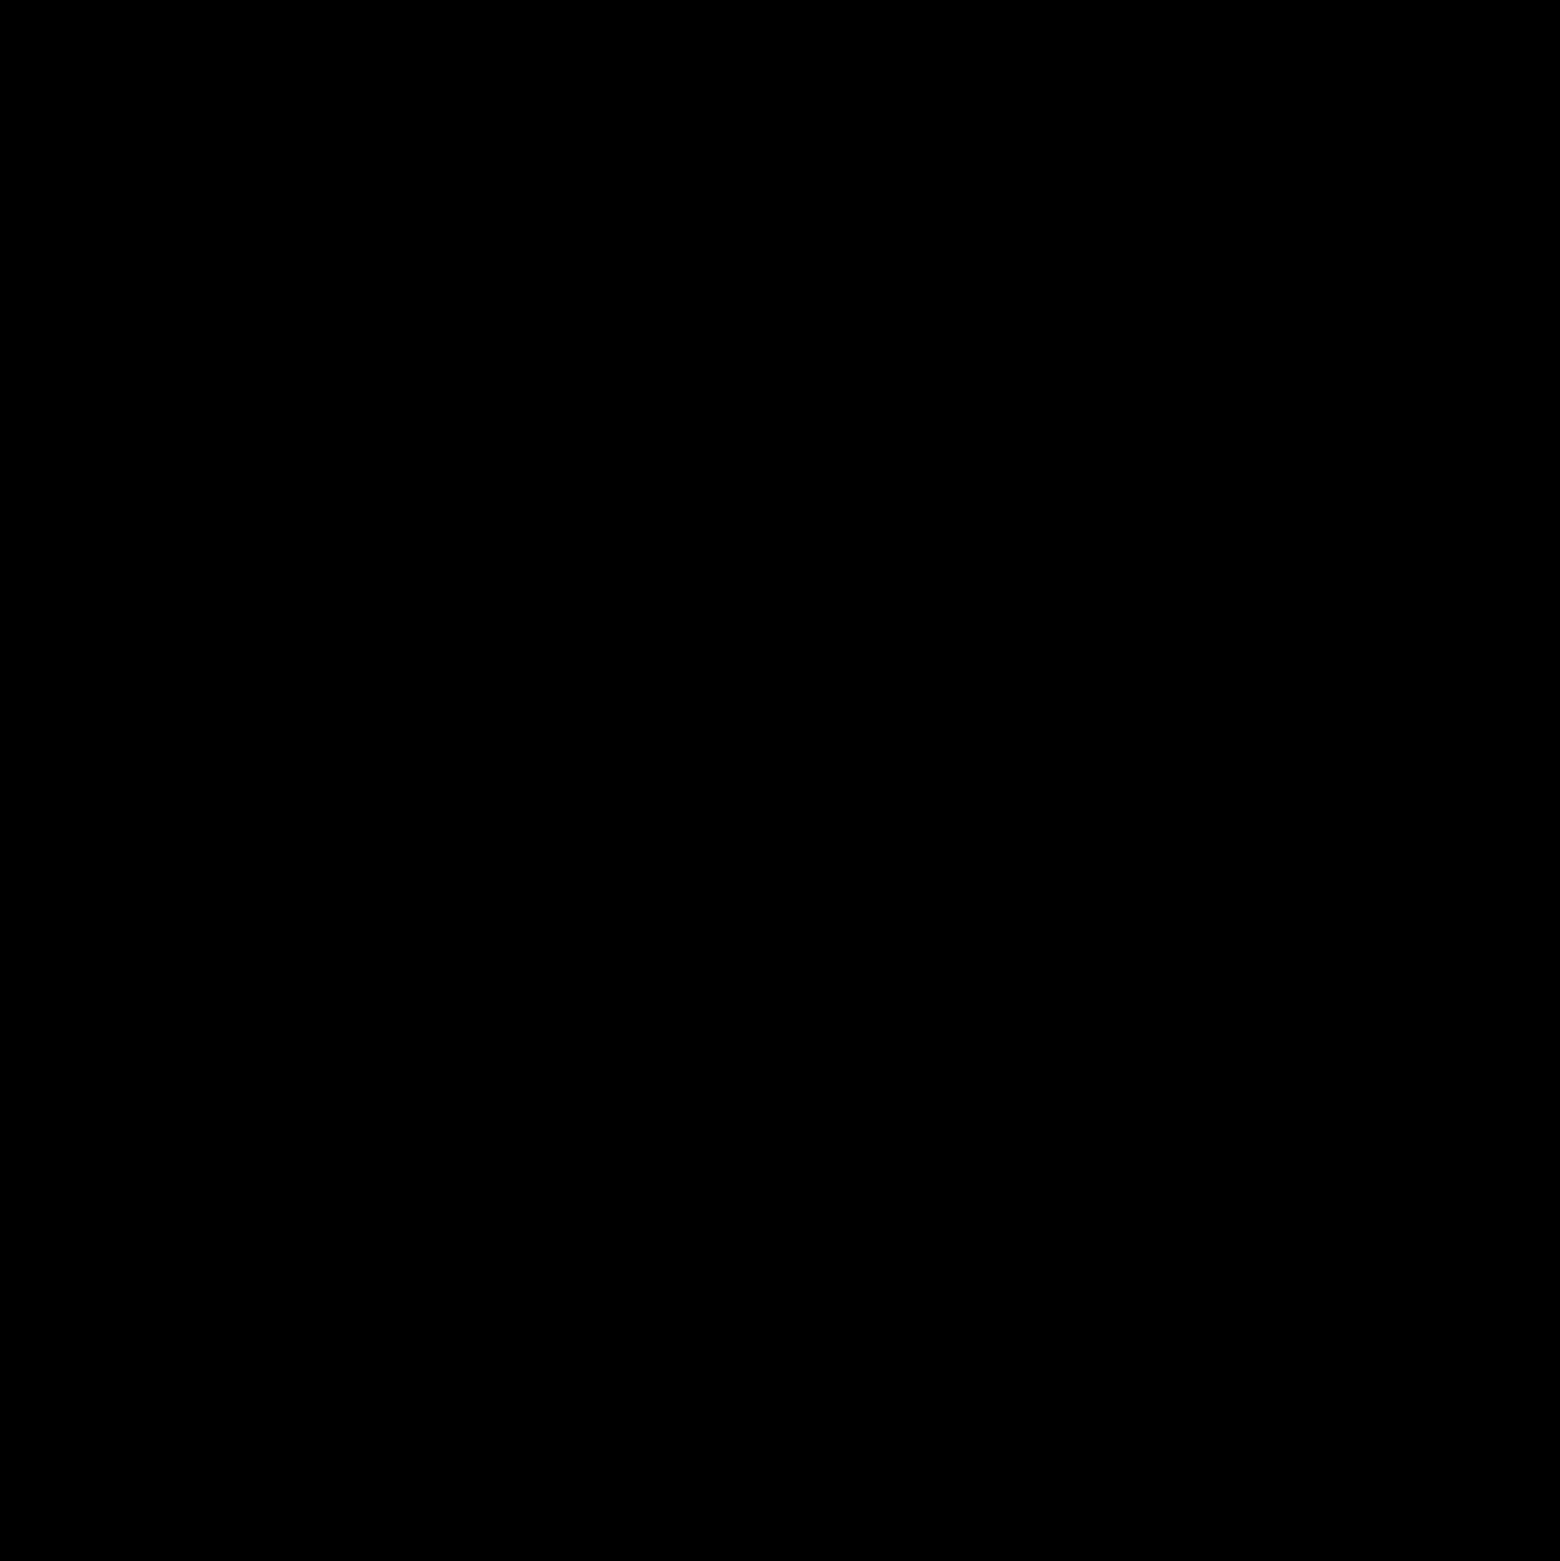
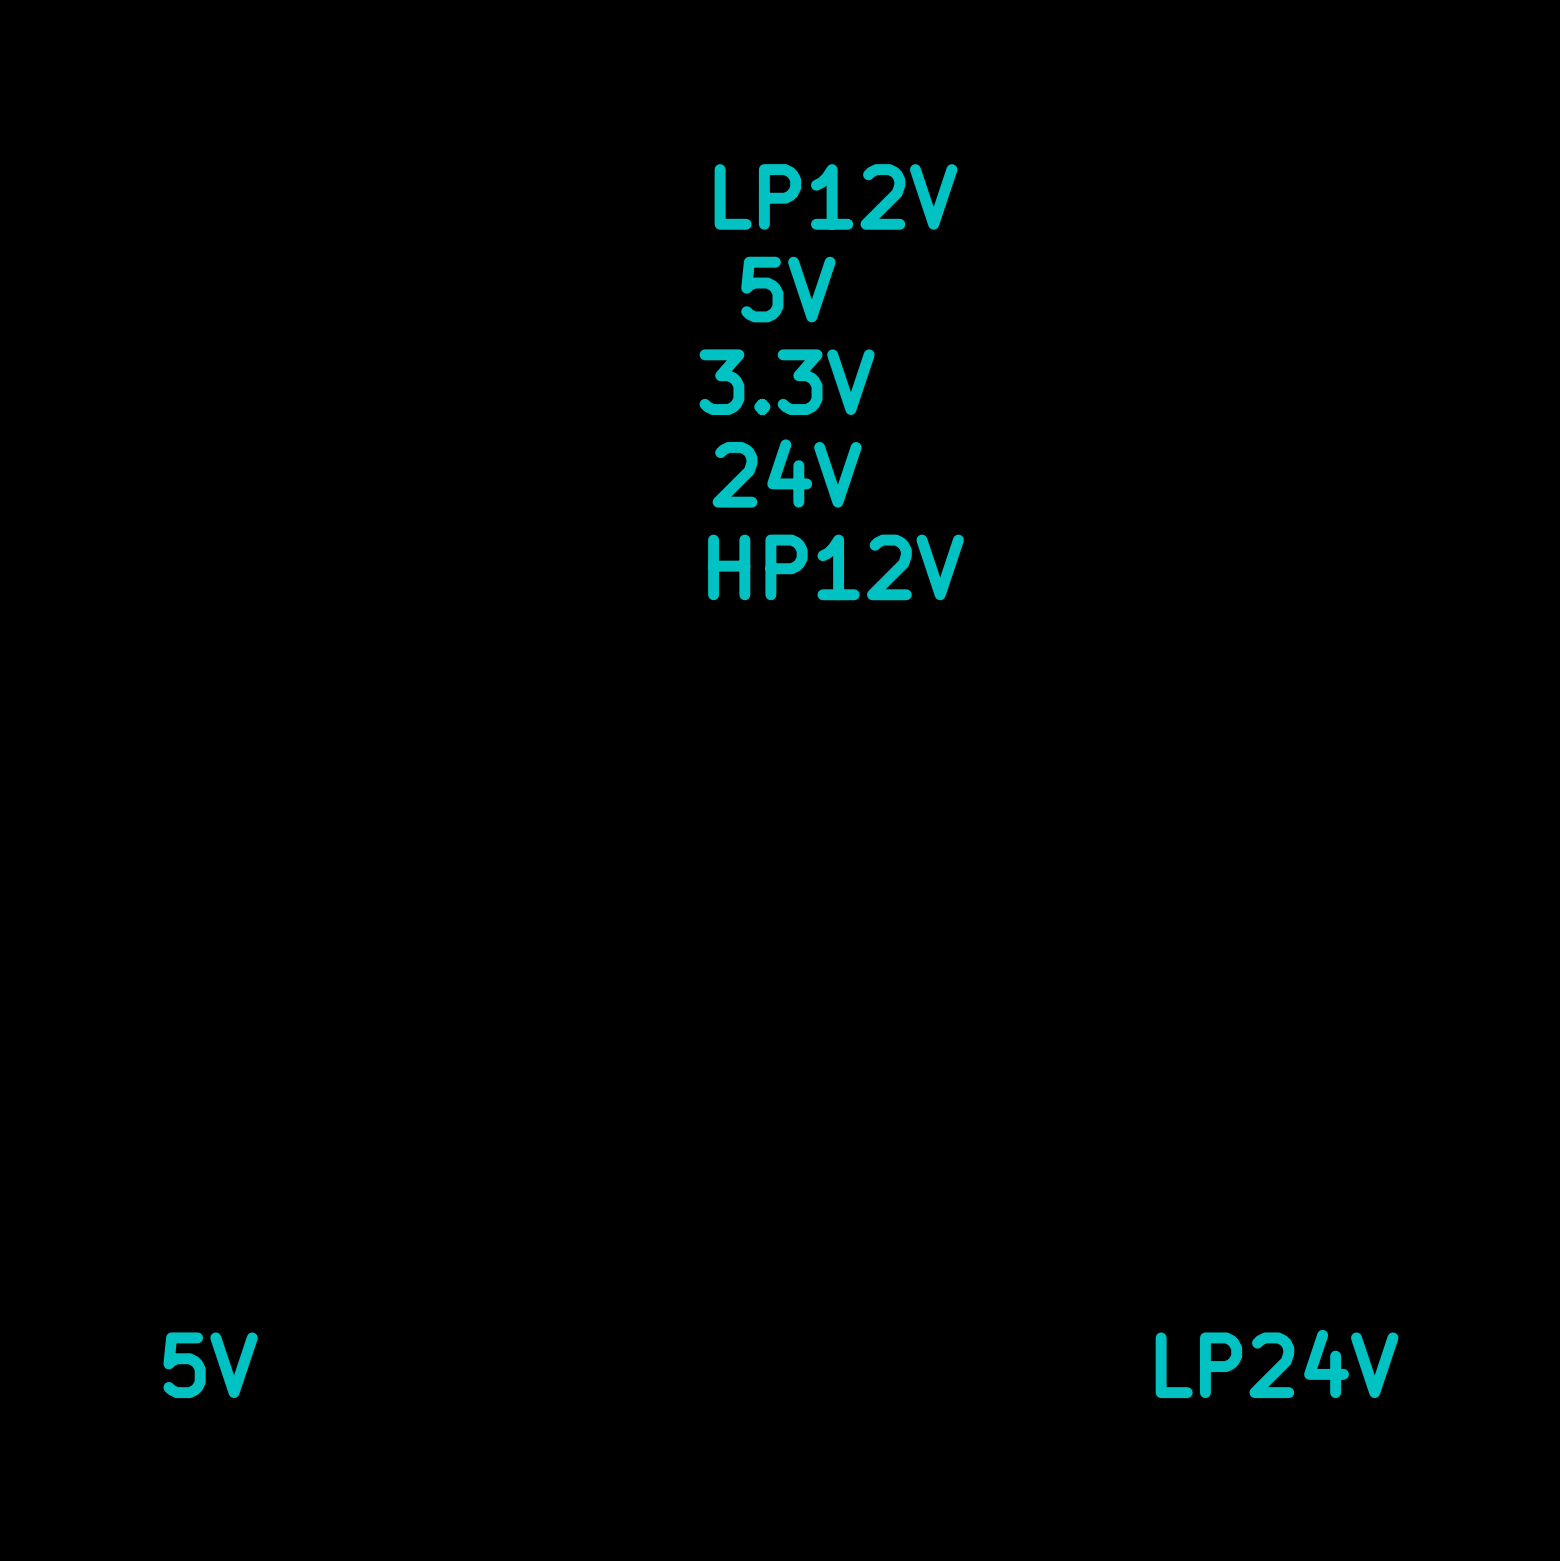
text: none -> LP12V (836, 196)
text: none -> 5V (788, 289)
text: none -> 3.3V (787, 382)
text: none -> 24V (787, 473)
text: none -> HP12V (836, 567)
text: none -> LP24V (1277, 1363)
text: none -> 5V (210, 1365)

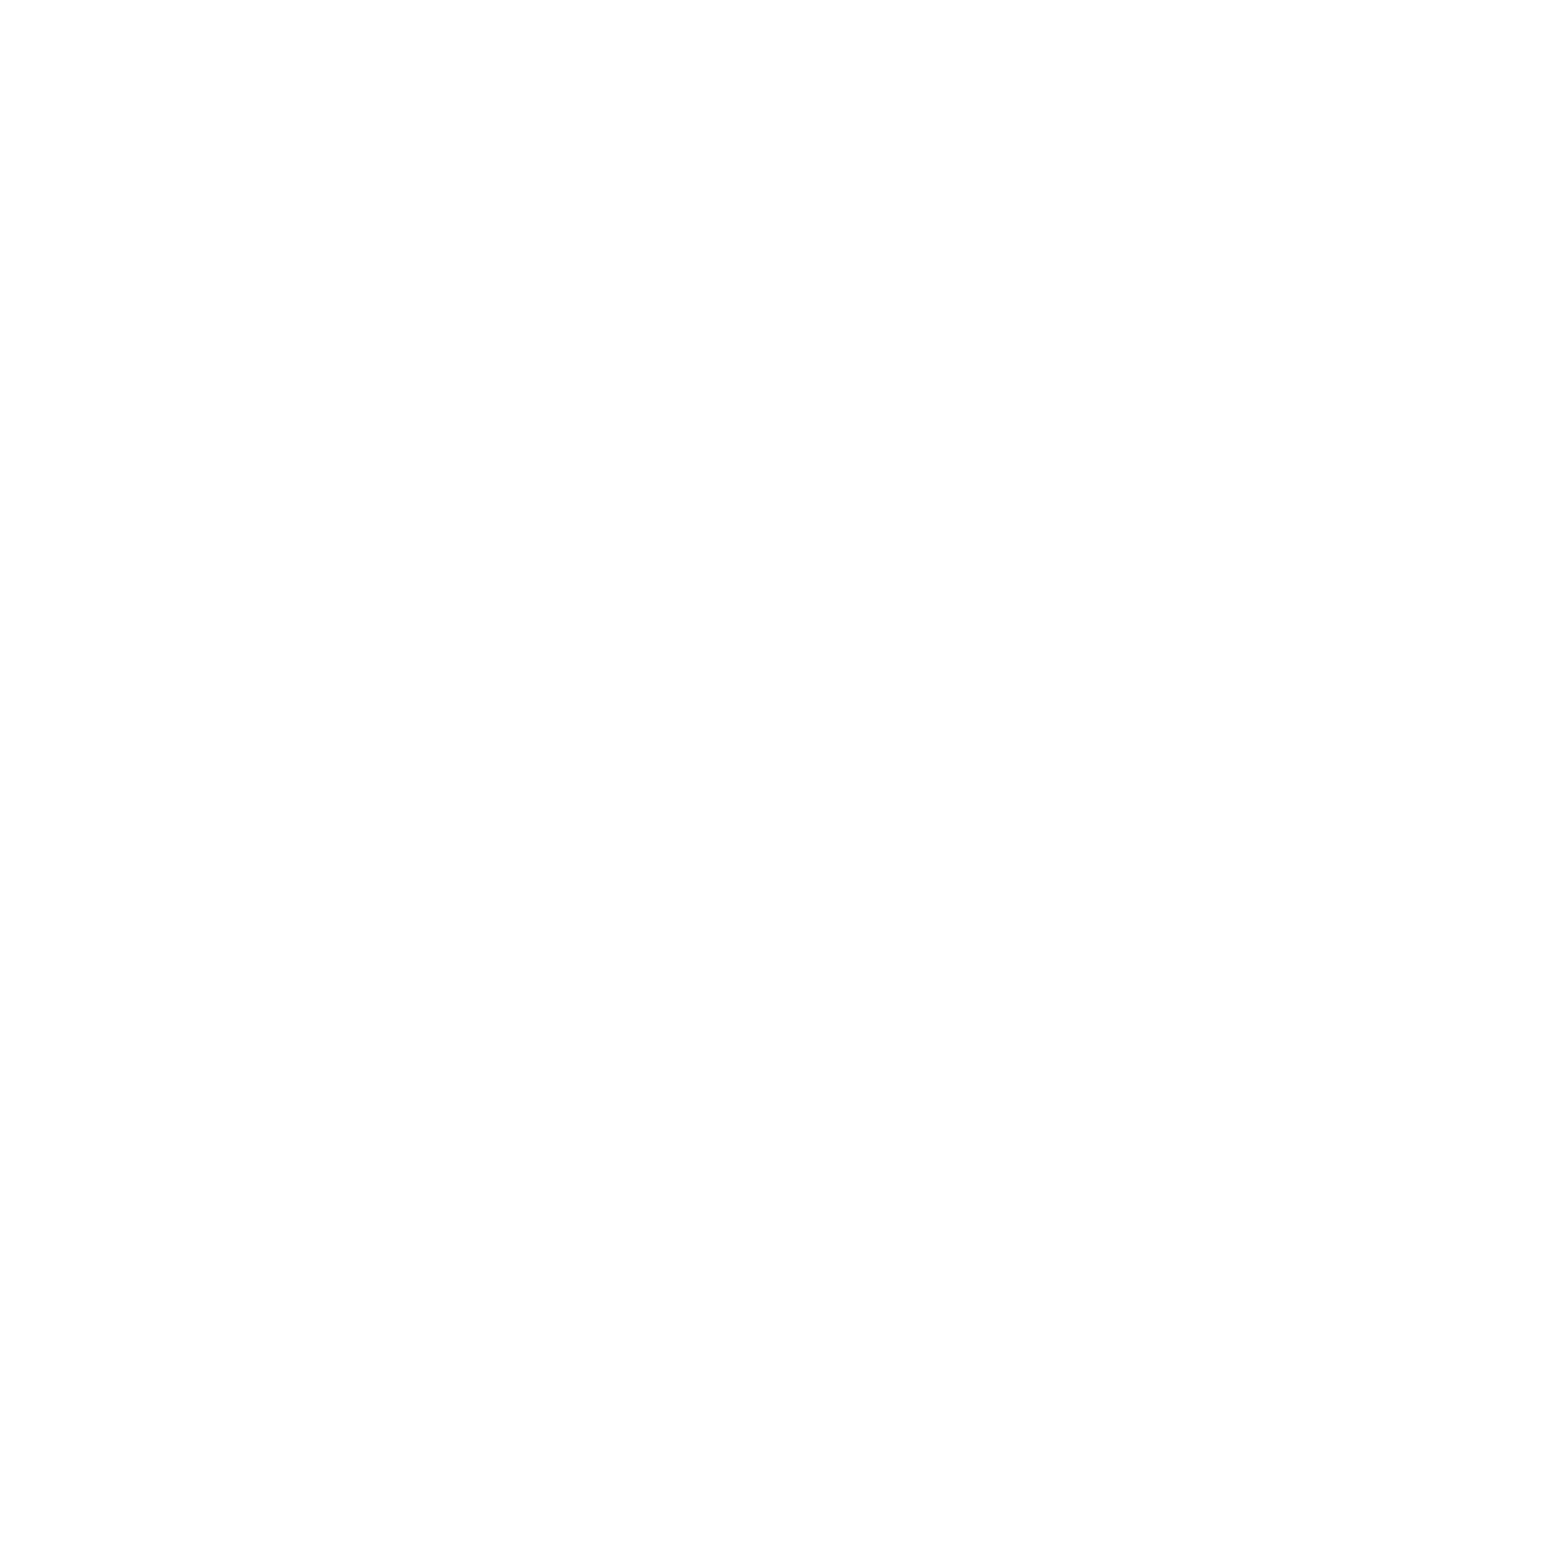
text: LP12V (836, 196) -> none
text: 5V (788, 289) -> none
text: 3.3V (787, 382) -> none
text: 24V (787, 473) -> none
text: HP12V (836, 567) -> none
text: LP24V (1277, 1363) -> none
text: 5V (210, 1365) -> none

